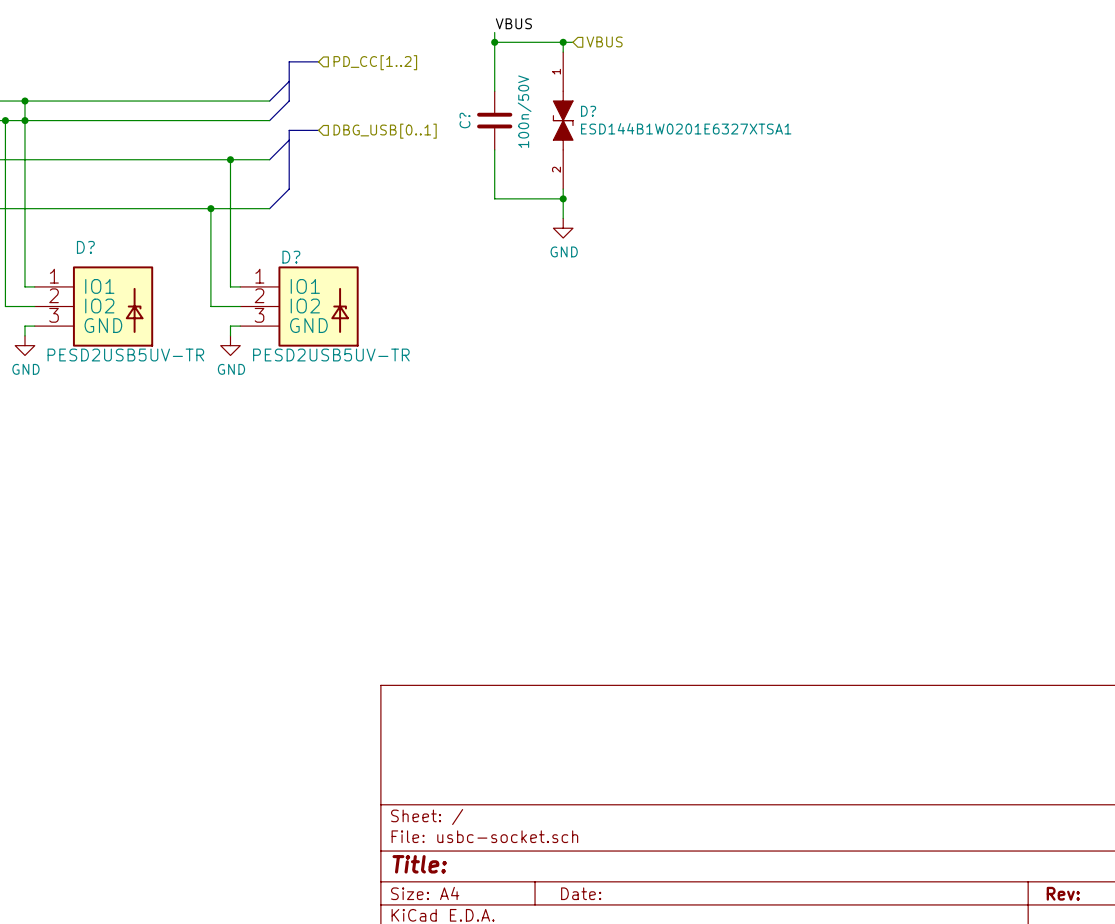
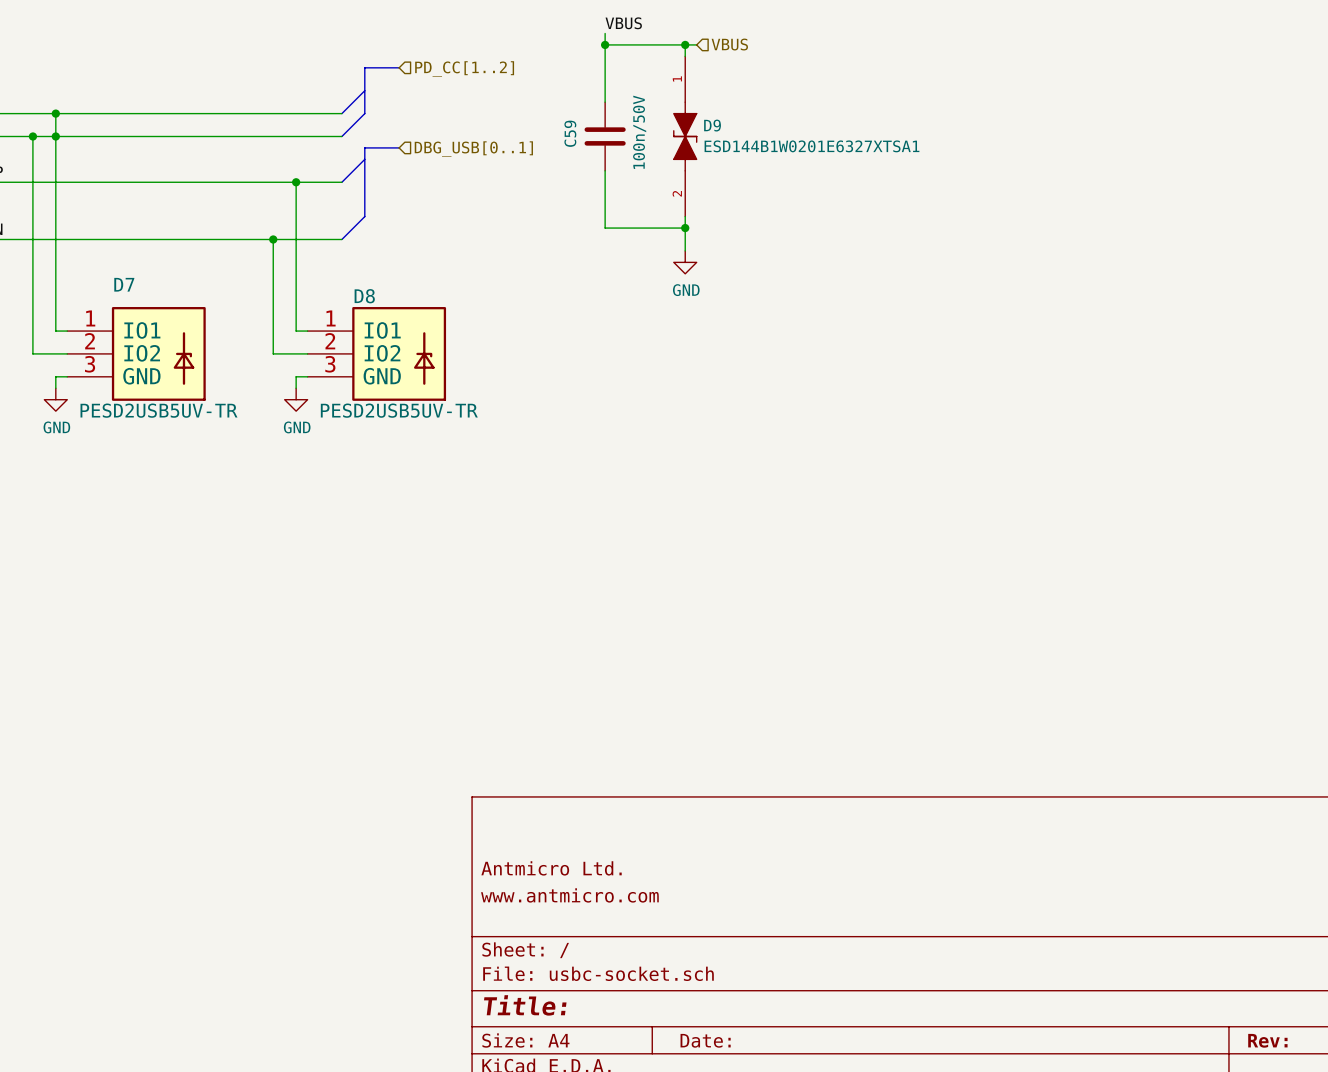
D? name: D? (588, 111) -> D9 (712, 125)
C? name: C? (464, 120) -> C59 (570, 133)
D? name: D? (85, 247) -> D7 (124, 284)
D? name: D? (291, 257) -> D8 (364, 296)
title block: none -> Antmicro Ltd. (551, 868)
title block: none -> www.antmicro.com (569, 895)

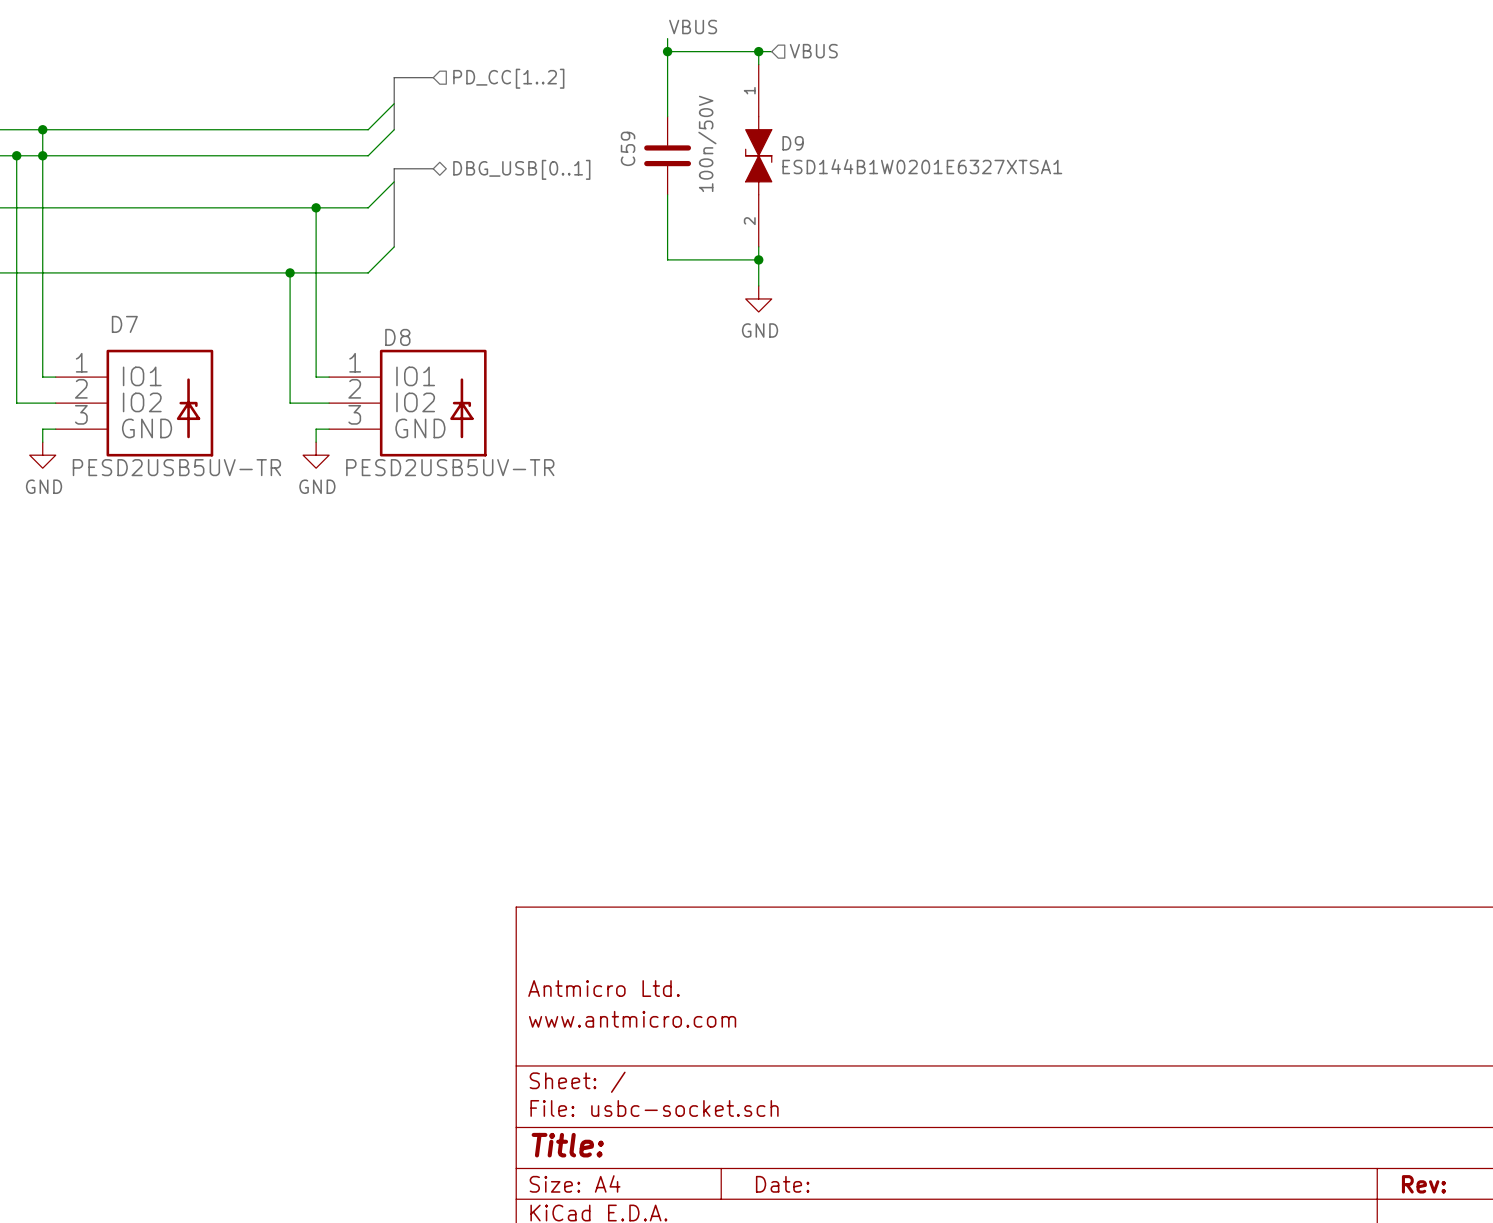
bus: (364, 90) (341, 113) -> none
bus: (364, 113) (341, 136) -> none
hierarchical label shape: input (473, 149) -> bidirectional (521, 169)
bus: (364, 159) (341, 182) -> none
bus: (364, 216) (341, 239) -> none

